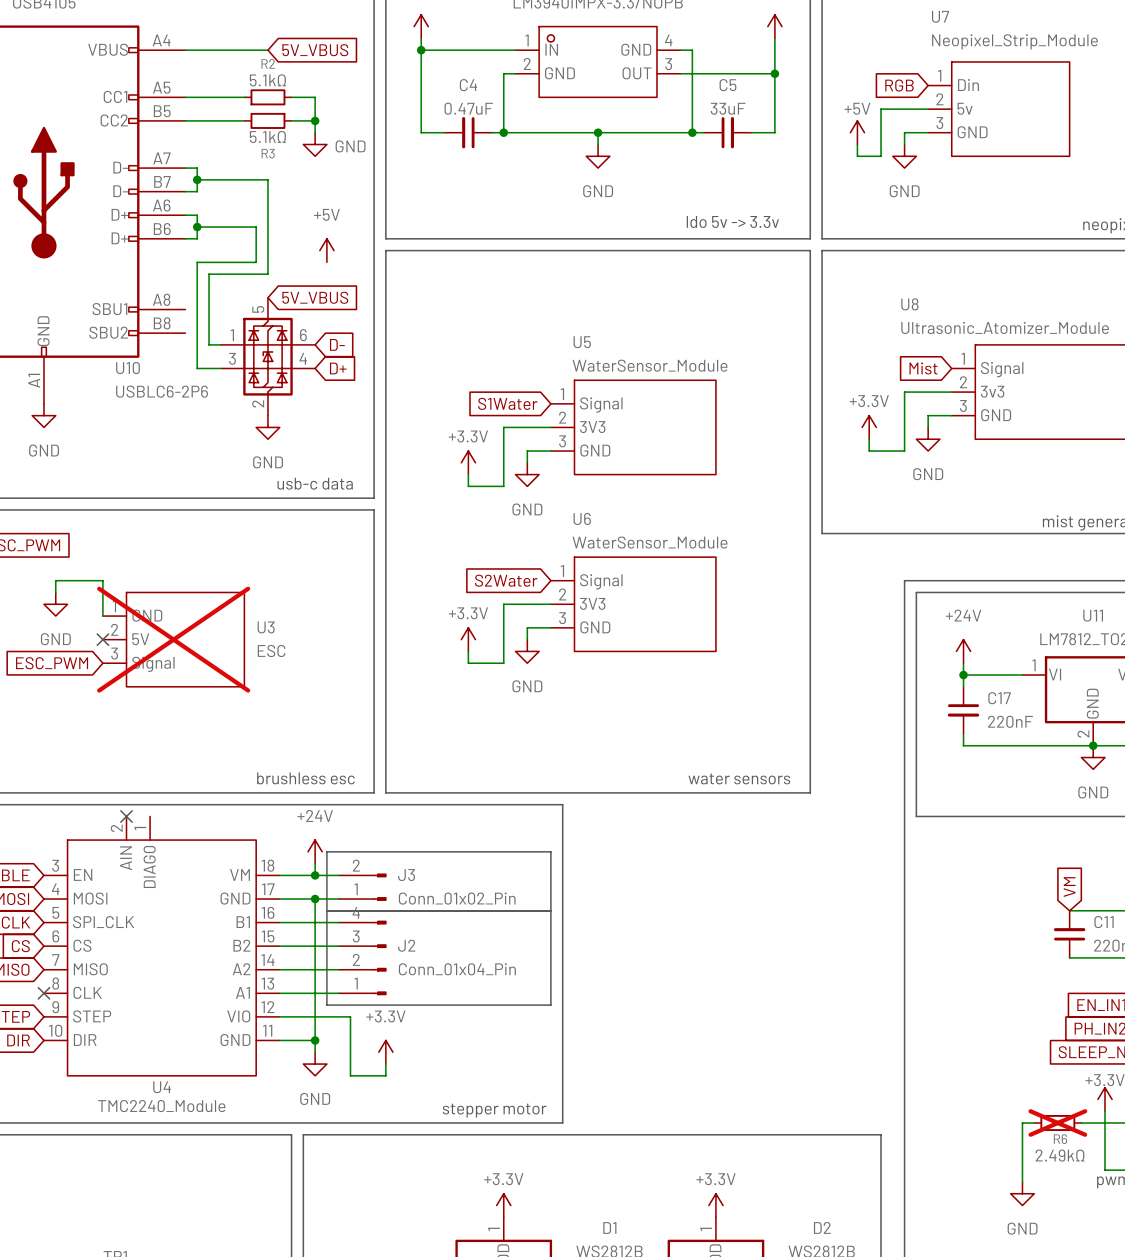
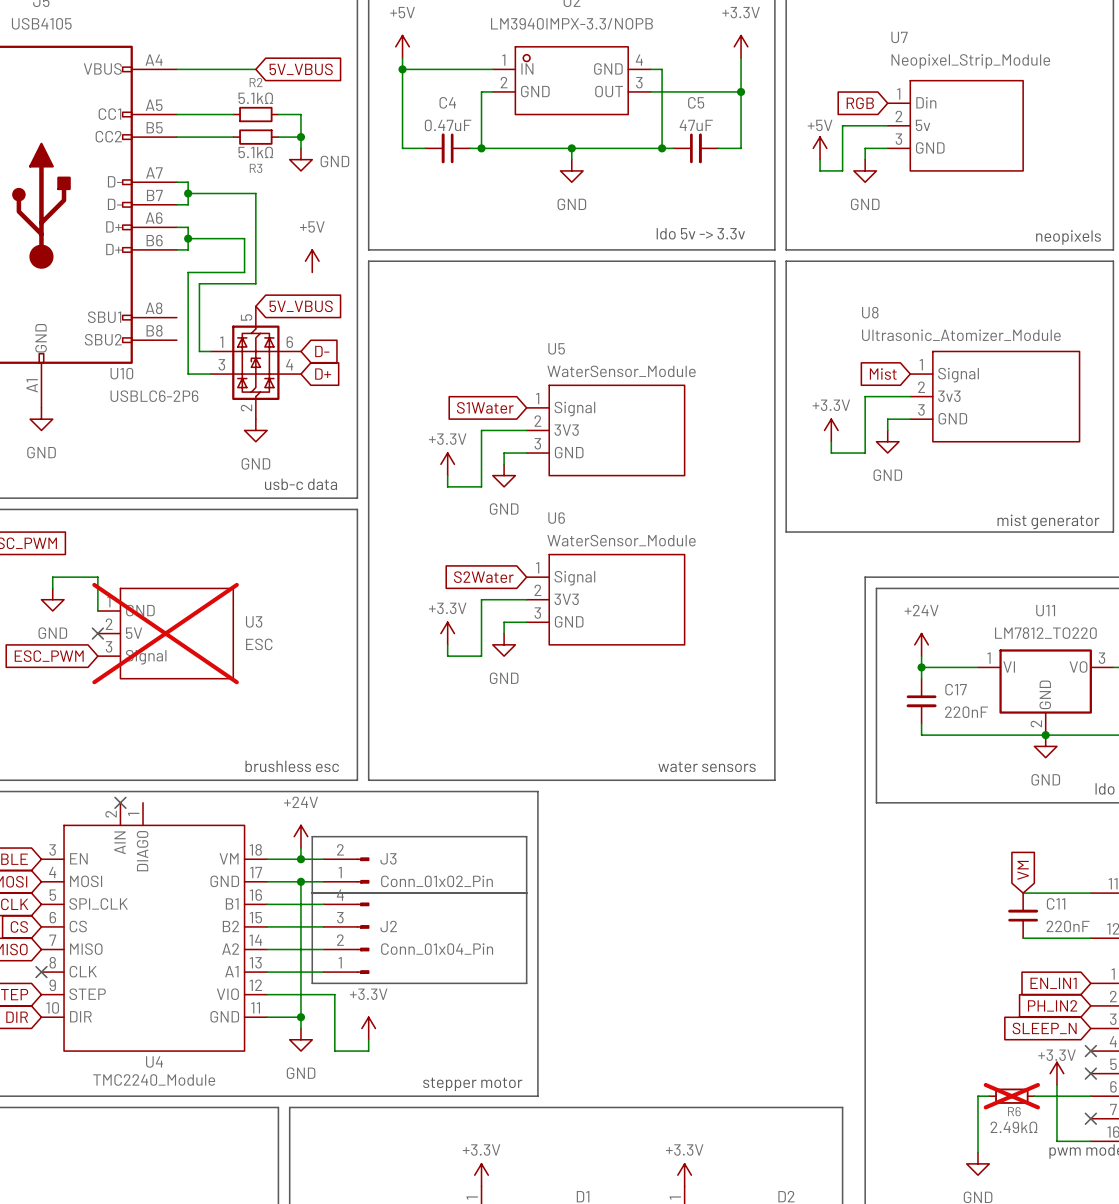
C5 value: 33uF (728, 108) -> 47uF (696, 125)

